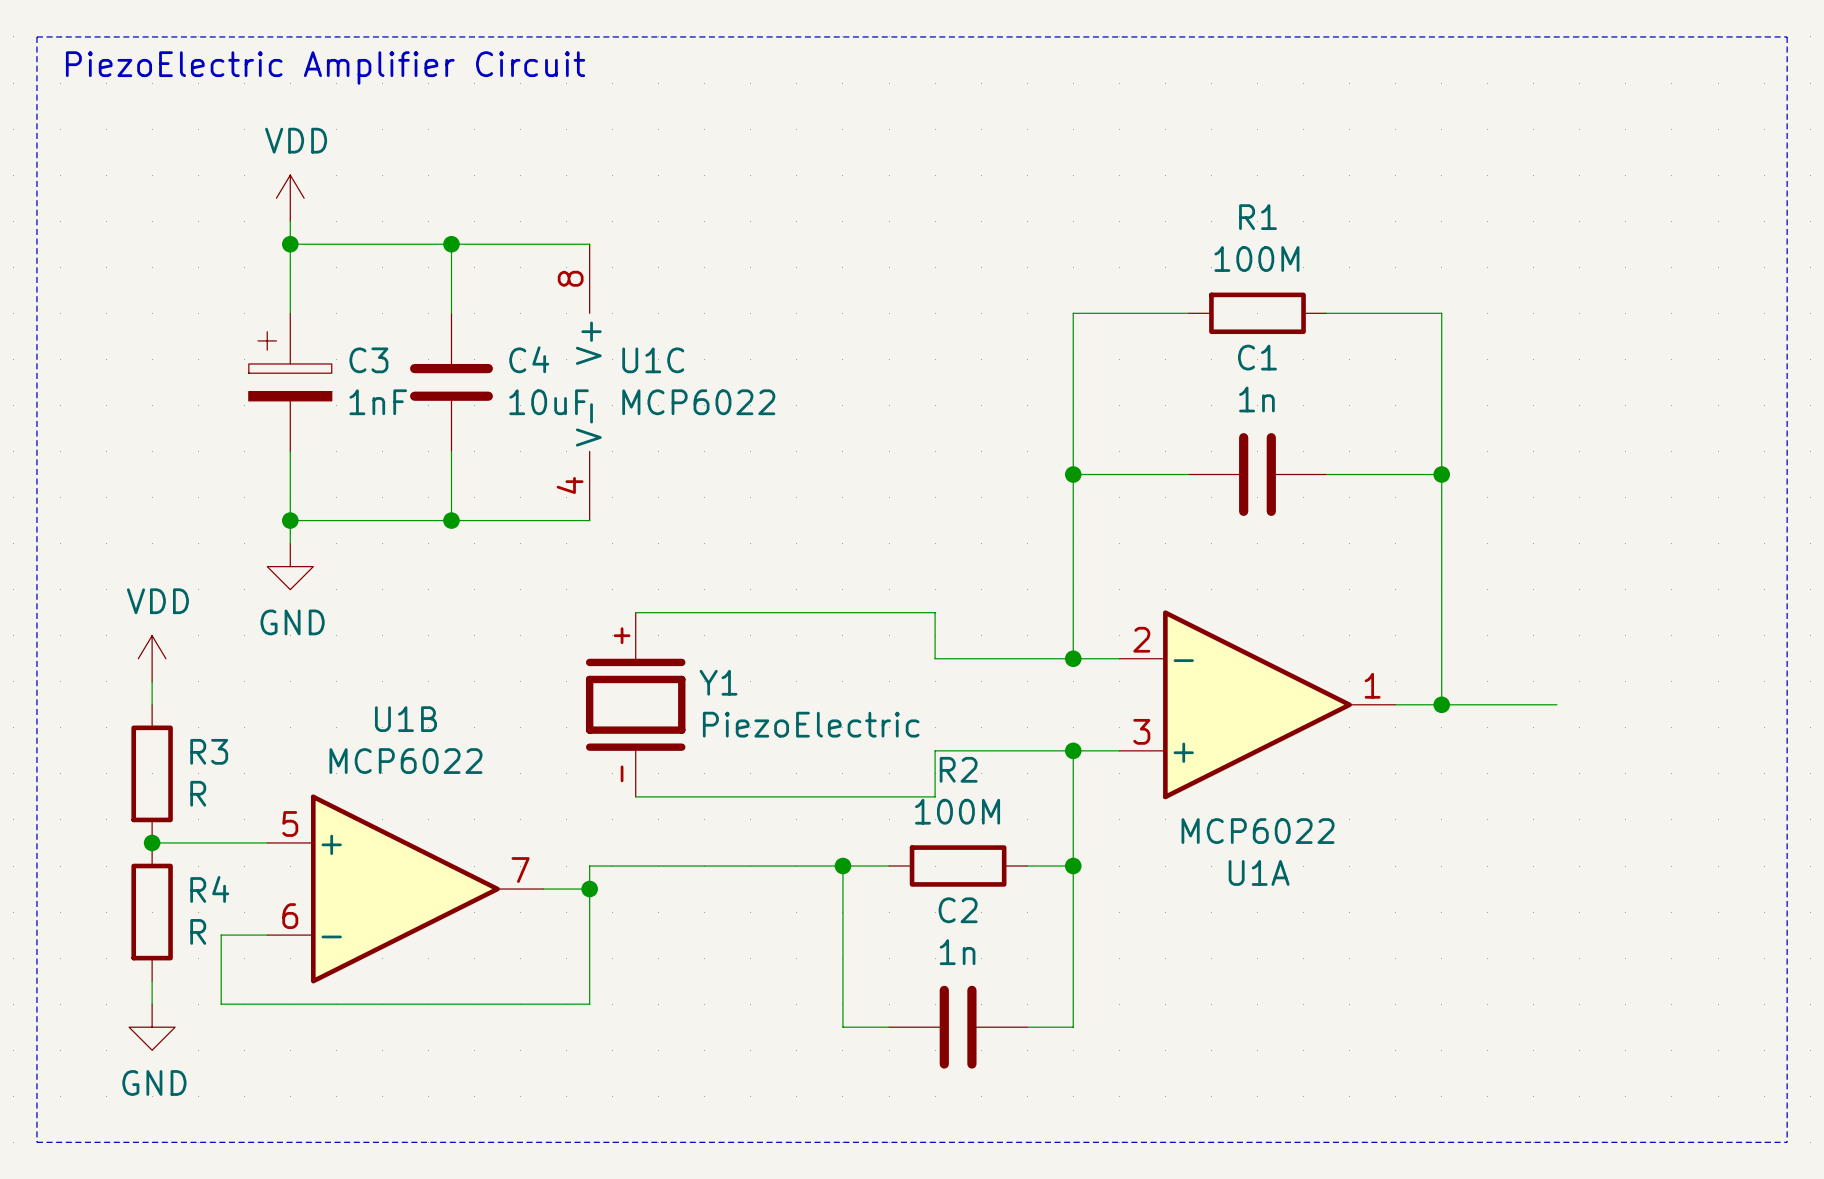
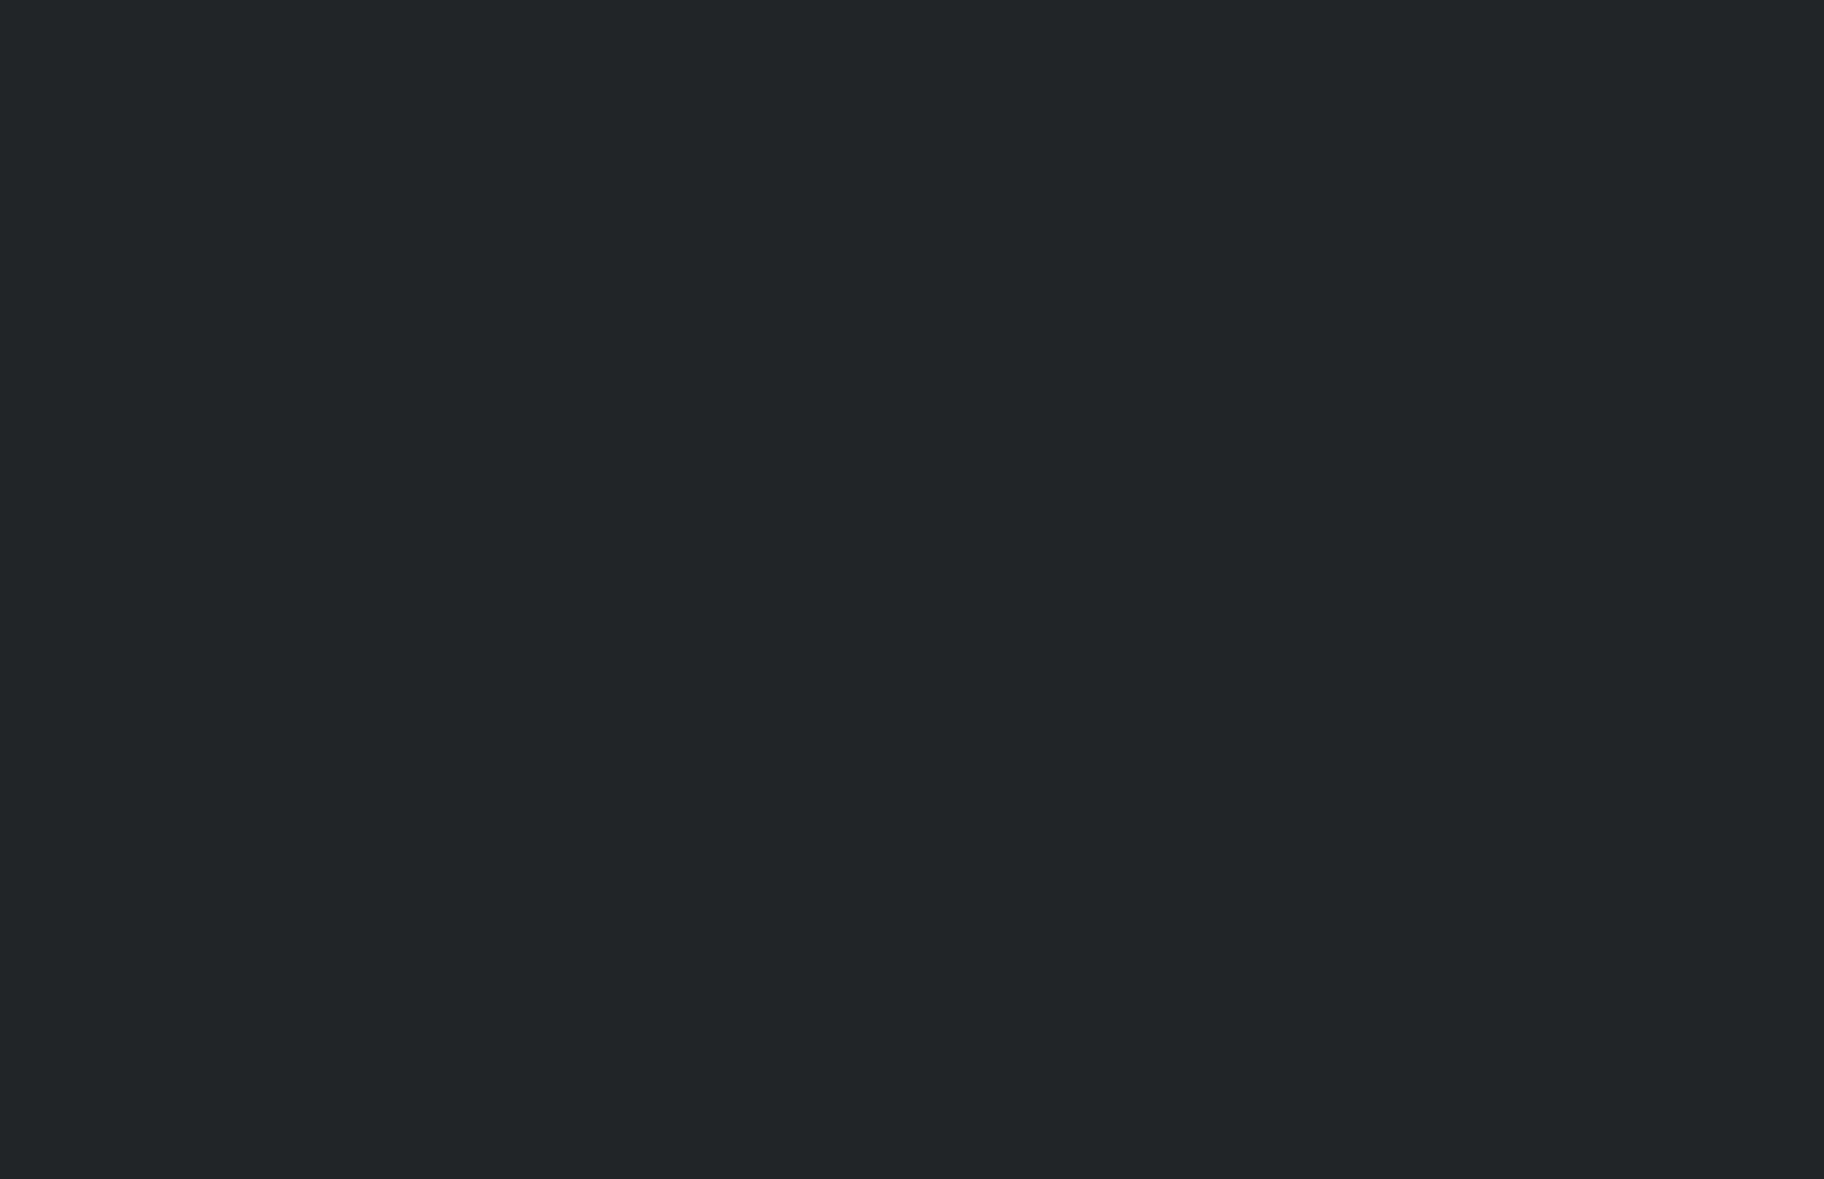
line: (36, 36) (1787, 36) (1787, 1142) (36, 1142) (36, 36) -> none
text: PiezoElectric Amplifier Circuit (325, 68) -> none
power symbol: VDD (290, 198) -> none
wire: (290, 221) (290, 313) -> none
wire: (290, 244) (589, 244) -> none
junction: (290, 244) -> none
wire: (451, 244) (451, 313) -> none
junction: (451, 244) -> none
wire: (1188, 313) (1073, 313) (1073, 658) -> none
R1: 100M (1257, 313) -> none
wire: (1326, 313) (1441, 313) (1441, 704) -> none
C3: 1nF (290, 382) -> none
C4: 10uF (451, 382) -> none
U1C: MCP6022 (589, 382) -> none
wire: (290, 451) (290, 543) -> none
wire: (451, 451) (451, 520) -> none
wire: (1073, 474) (1188, 474) -> none
junction: (1073, 474) -> none
C1: 1n (1257, 474) -> none
wire: (1326, 474) (1441, 474) -> none
junction: (1441, 474) -> none
wire: (290, 520) (589, 520) -> none
junction: (290, 520) -> none
junction: (451, 520) -> none
power symbol: GND (290, 566) -> none
wire: (635, 612) (935, 612) (935, 658) (1119, 658) -> none
power symbol: VDD (152, 658) -> none
junction: (1073, 658) -> none
wire: (152, 681) (152, 704) -> none
Y1: PiezoElectric (635, 704) -> none
U1A: MCP6022 (1257, 704) -> none
wire: (1395, 704) (1556, 704) -> none
junction: (1441, 704) -> none
wire: (1073, 750) (1073, 1027) (1027, 1027) -> none
junction: (1073, 750) -> none
wire: (1119, 750) (935, 750) (935, 796) (635, 796) -> none
R3: R (152, 773) -> none
wire: (152, 842) (267, 842) -> none
junction: (152, 842) -> none
wire: (842, 866) (842, 1027) (889, 1027) -> none
junction: (842, 866) -> none
wire: (889, 866) (589, 866) (589, 1004) (221, 1004) (221, 935) (267, 935) -> none
R2: 100M (958, 866) -> none
wire: (1027, 866) (1073, 866) -> none
junction: (1073, 866) -> none
U1B: MCP6022 (405, 889) -> none
wire: (543, 889) (589, 889) -> none
junction: (589, 889) -> none
R4: R (152, 912) -> none
wire: (152, 981) (152, 1004) -> none
power symbol: GND (152, 1027) -> none
C2: 1n (958, 1027) -> none

